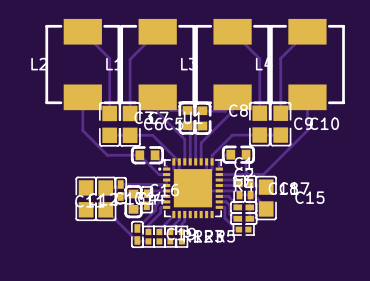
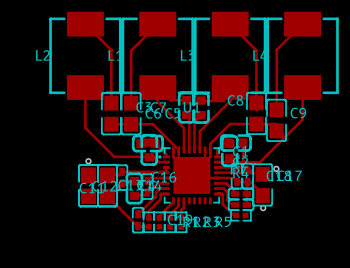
C10: (280, 124) -> none
track: (82, 130) (107, 155) (139, 155) (153, 168) -> (85, 119) (85, 127) (114, 156) (153, 156)
part: none -> (276, 120)
part: none -> (149, 149)
part: none -> (229, 151)
via: none -> (88, 161)
via: none -> (276, 168)
part: none -> (88, 185)
part: none -> (107, 185)
C15: (266, 198) -> none
part: none -> (262, 184)
via: none -> (263, 208)

